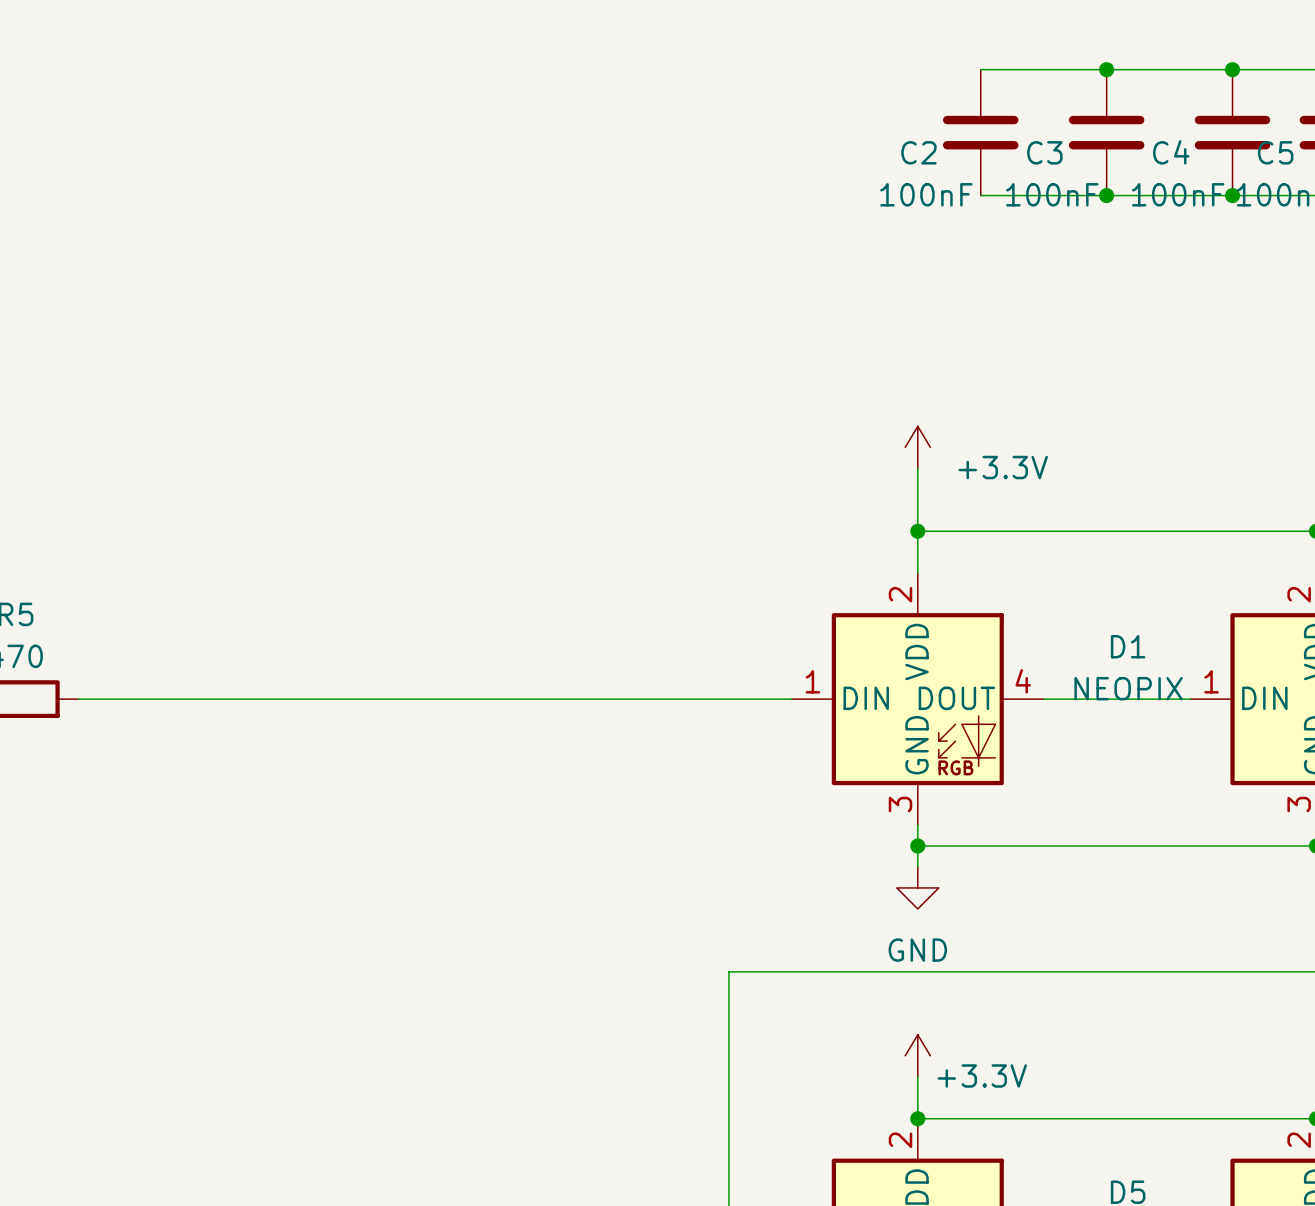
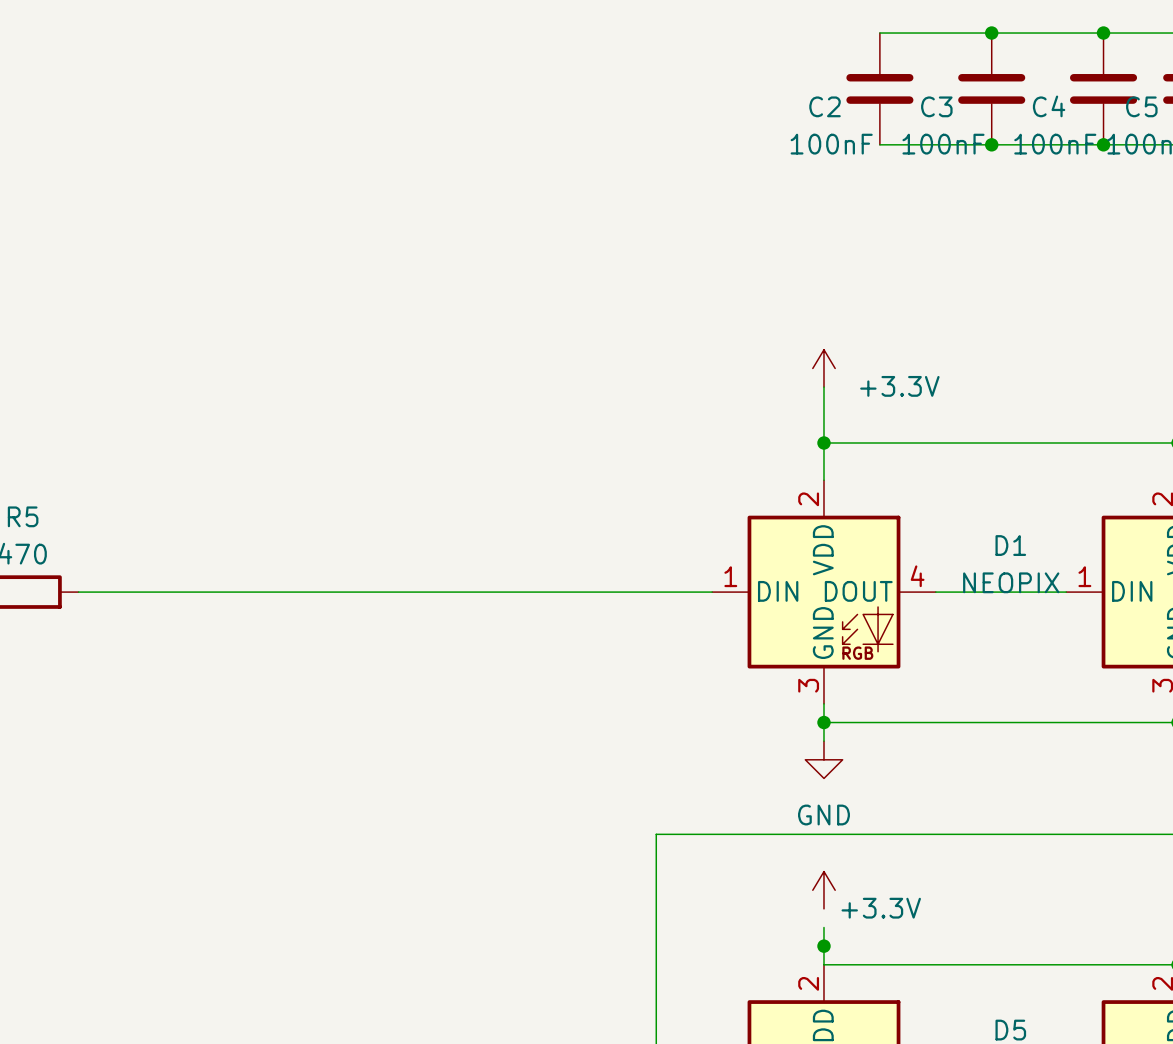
power symbol position: +3.3V (917, 1055) -> +3.3V (823, 890)
junction position: (917, 1118) -> (823, 946)

